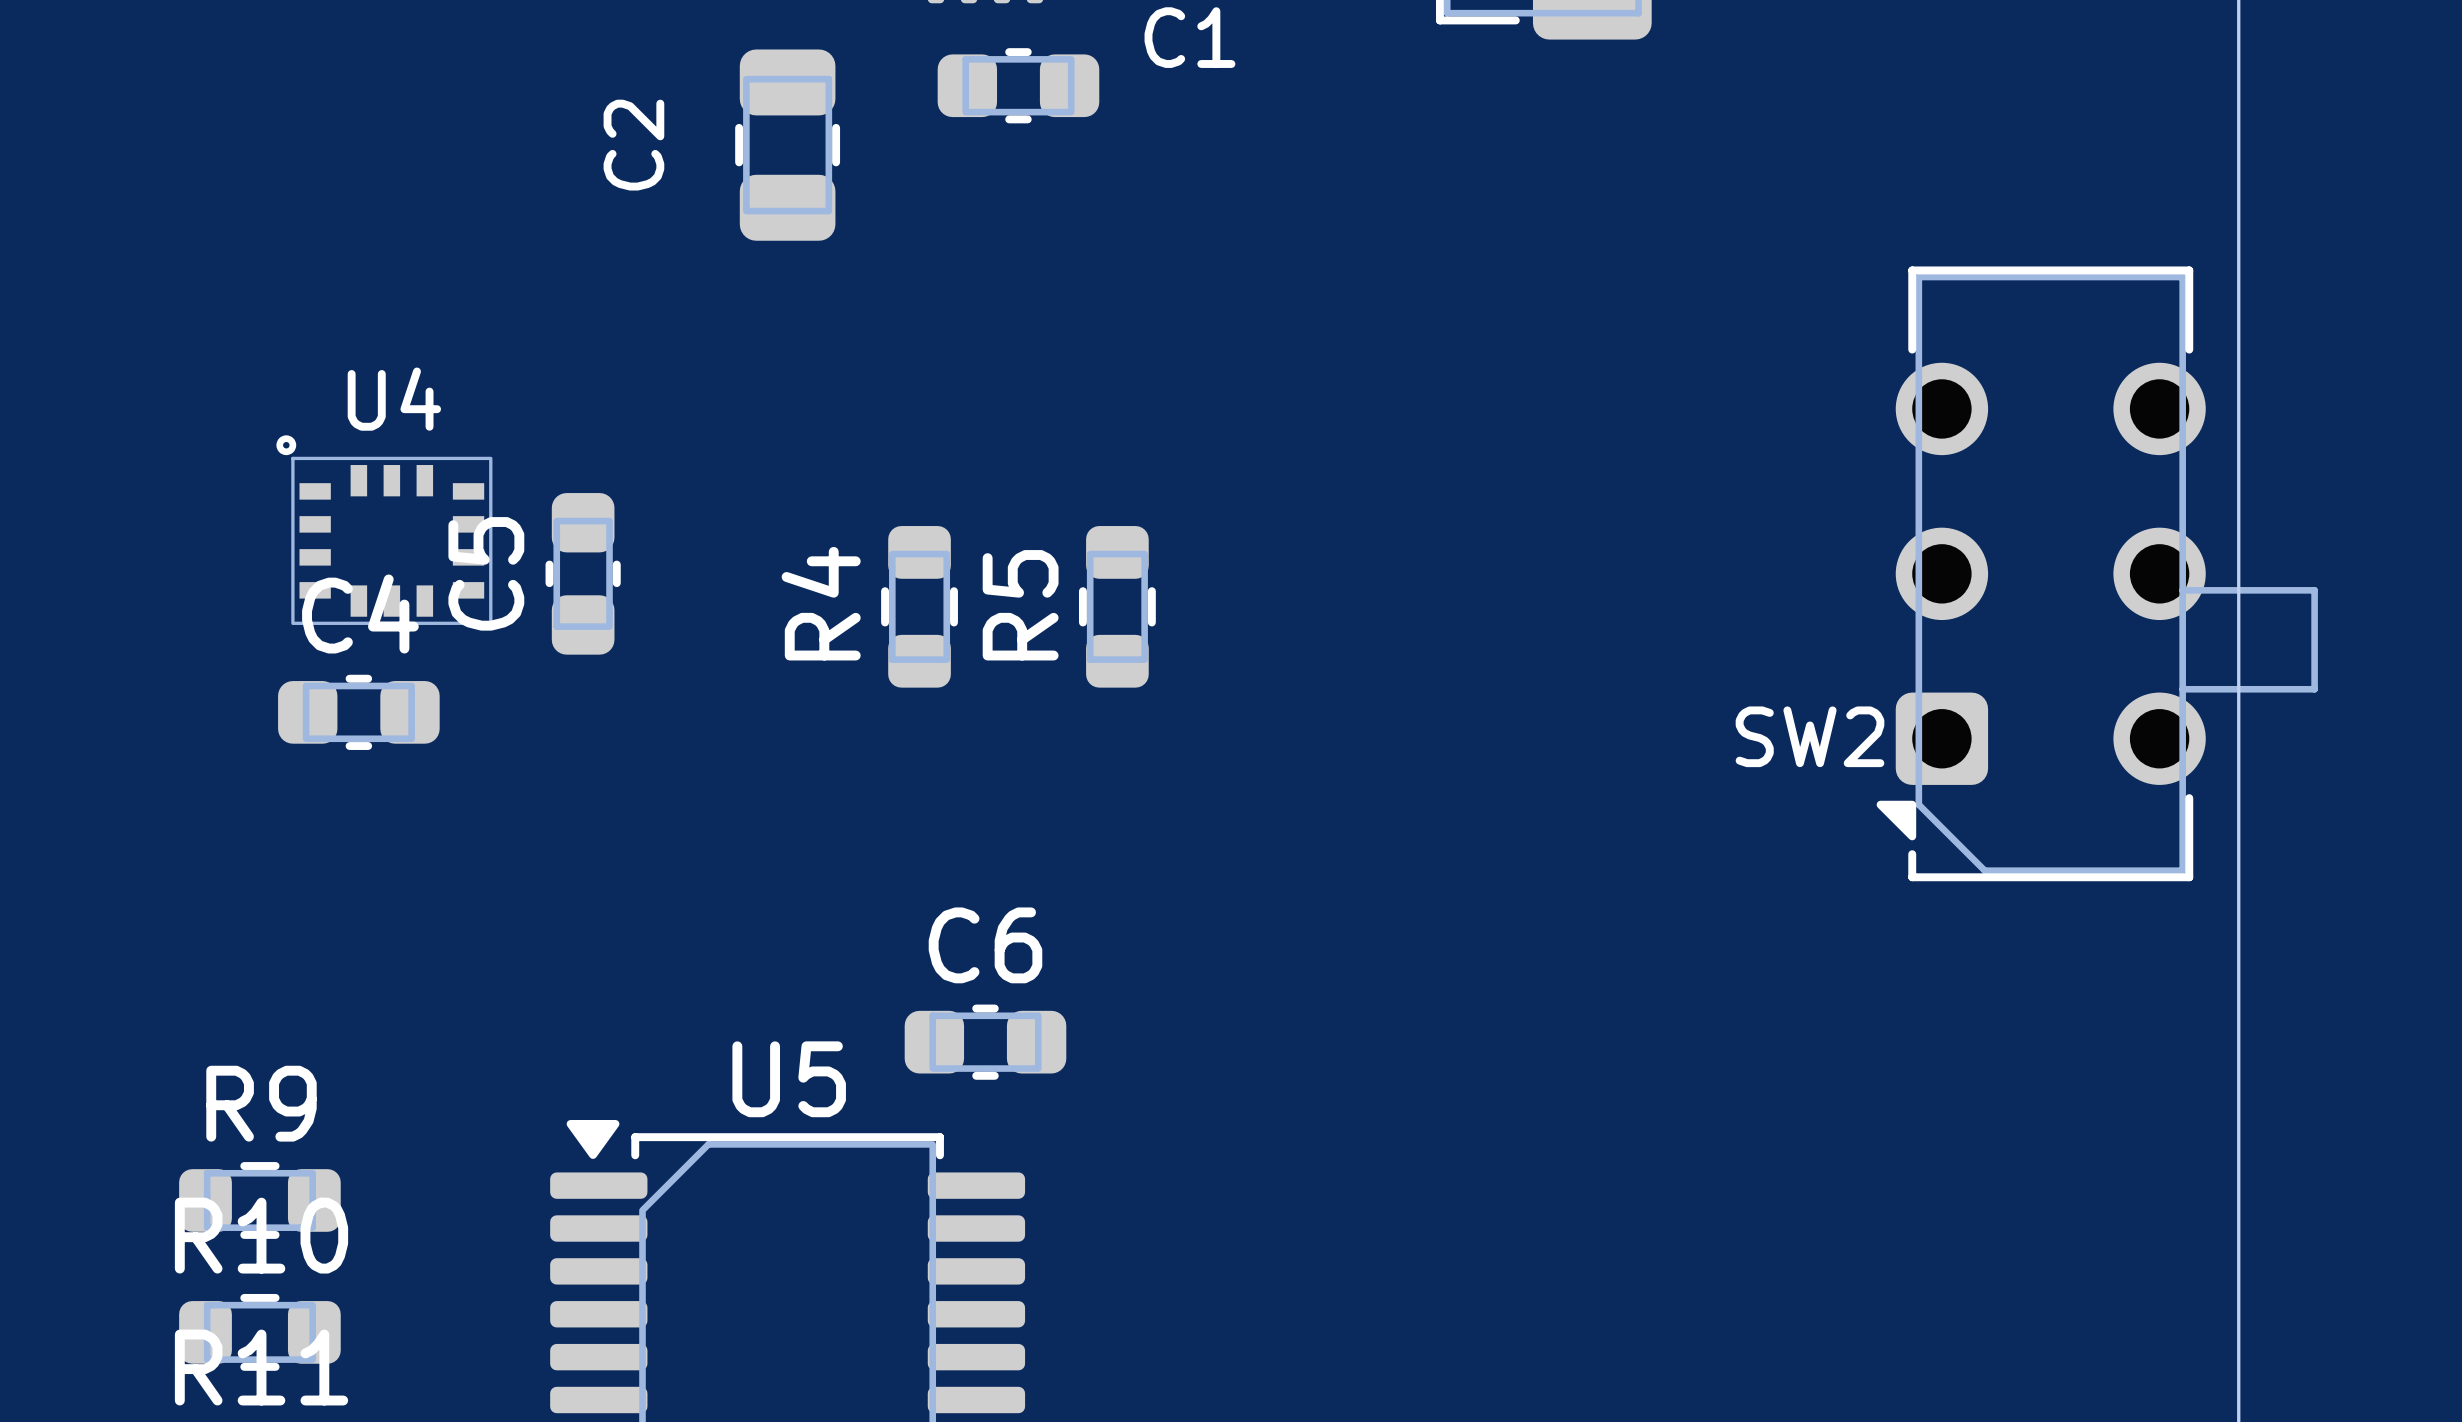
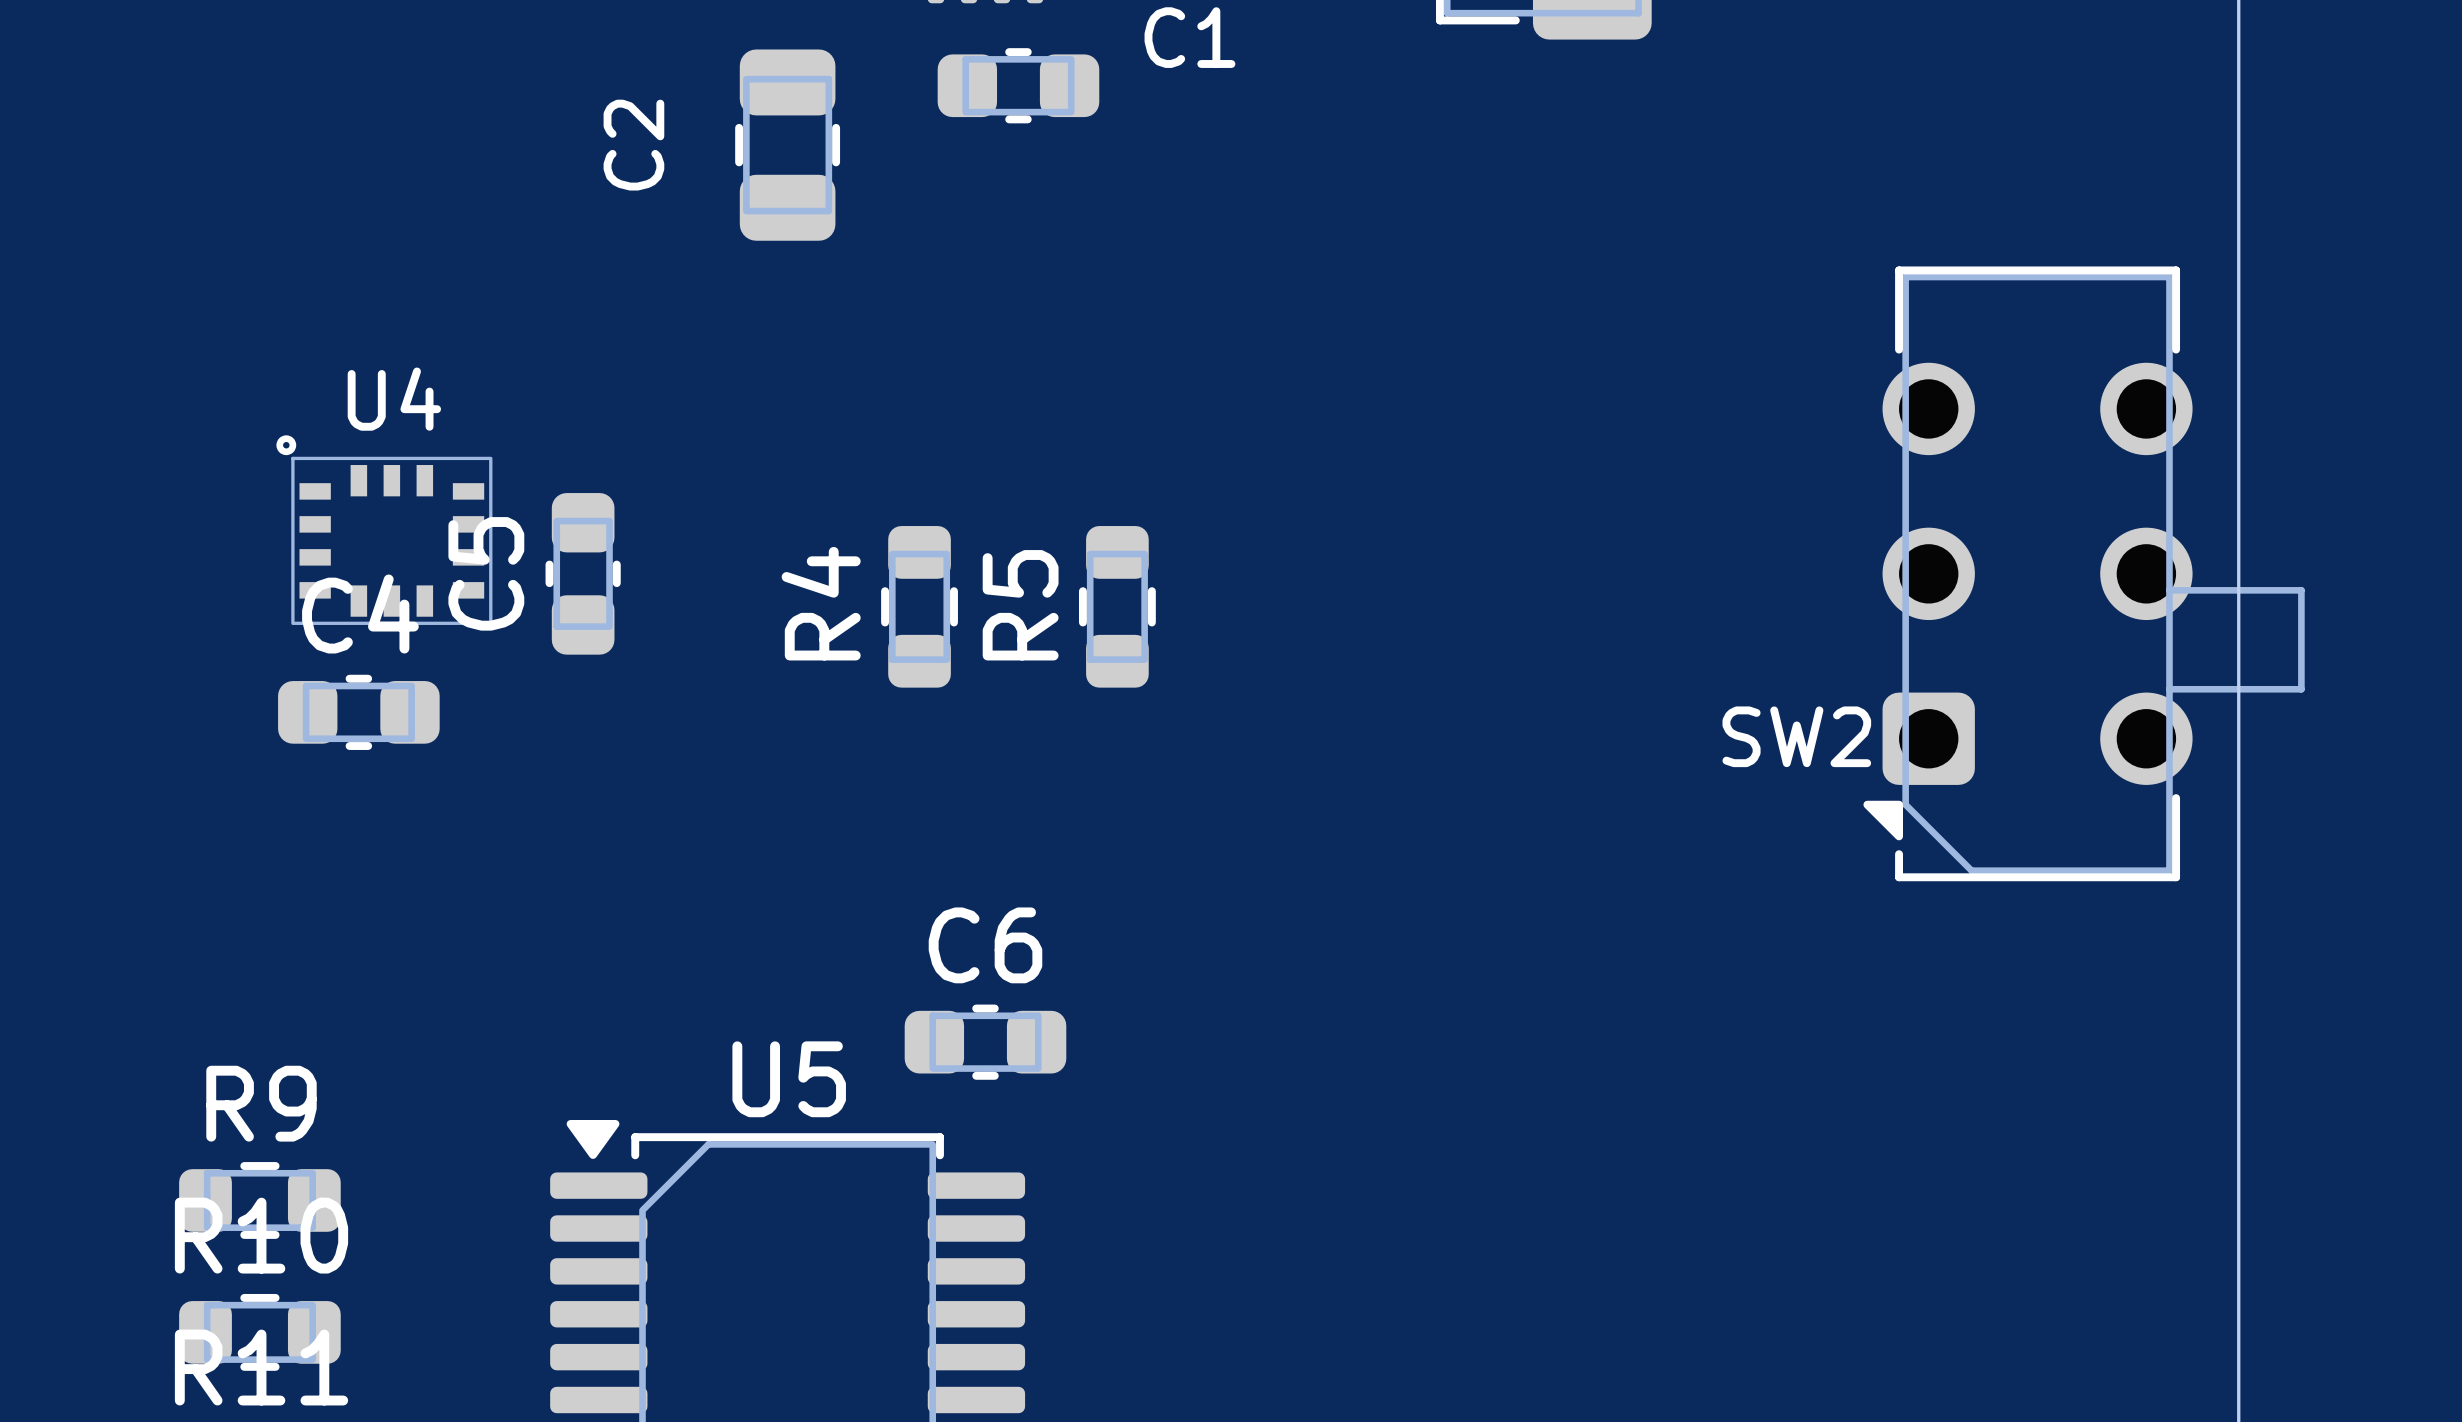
SW2 position: (2097, 573) -> (2084, 573)

